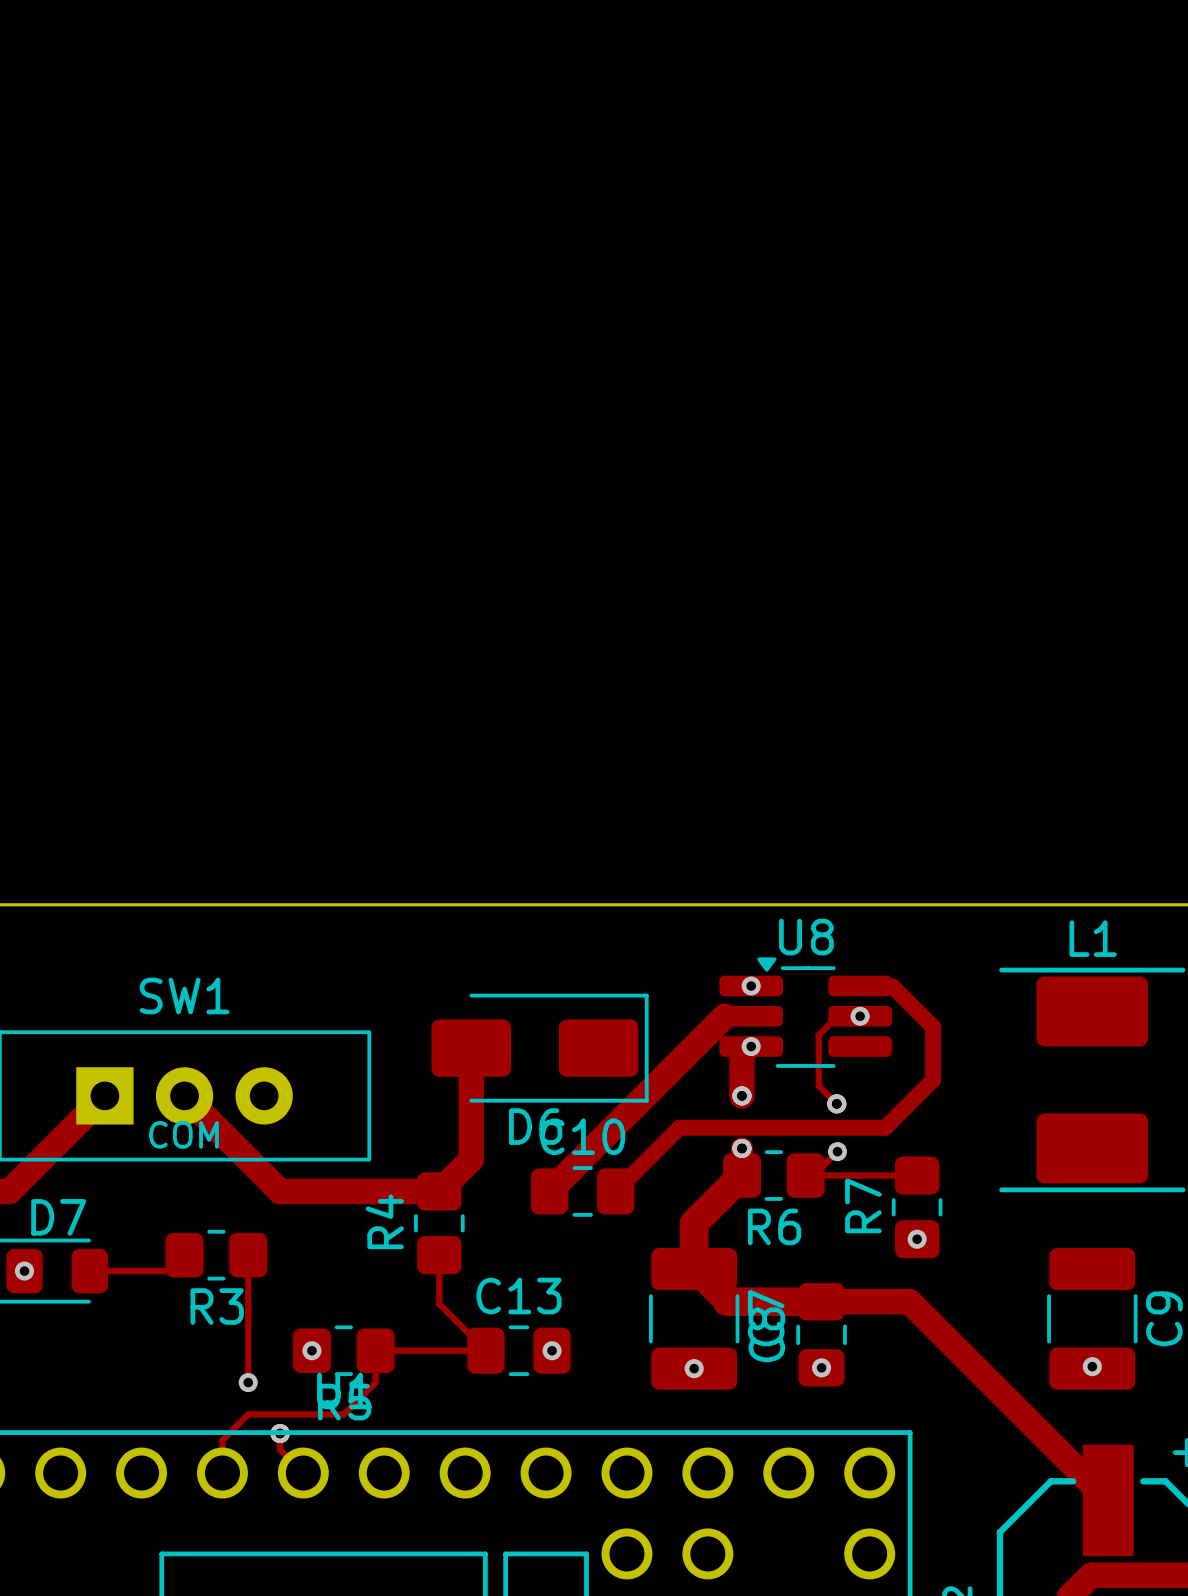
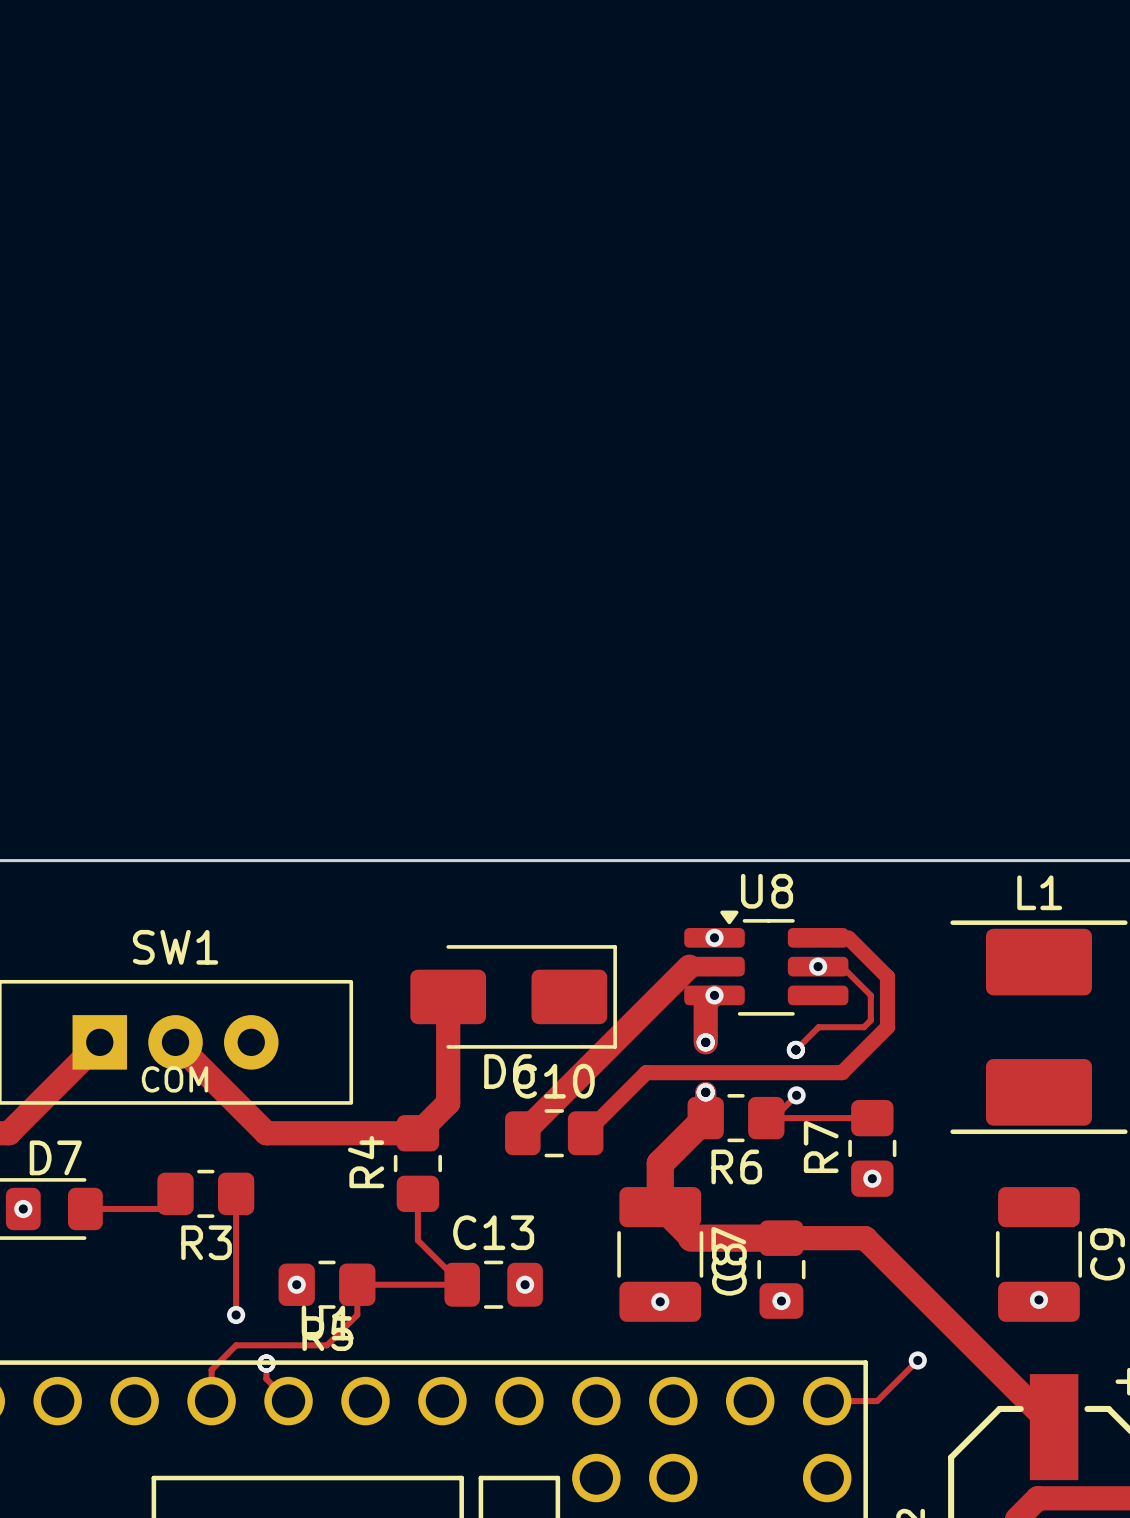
track: (860, 1016) (837, 1016) (818, 1035) (818, 1085) (836, 1103) -> (818, 966) (842, 966) (870, 995) (870, 1020) (863, 1027) (818, 1027) (795, 1049)
track: none -> (917, 1360) (877, 1401) (827, 1401)
via: none -> (917, 1360)

